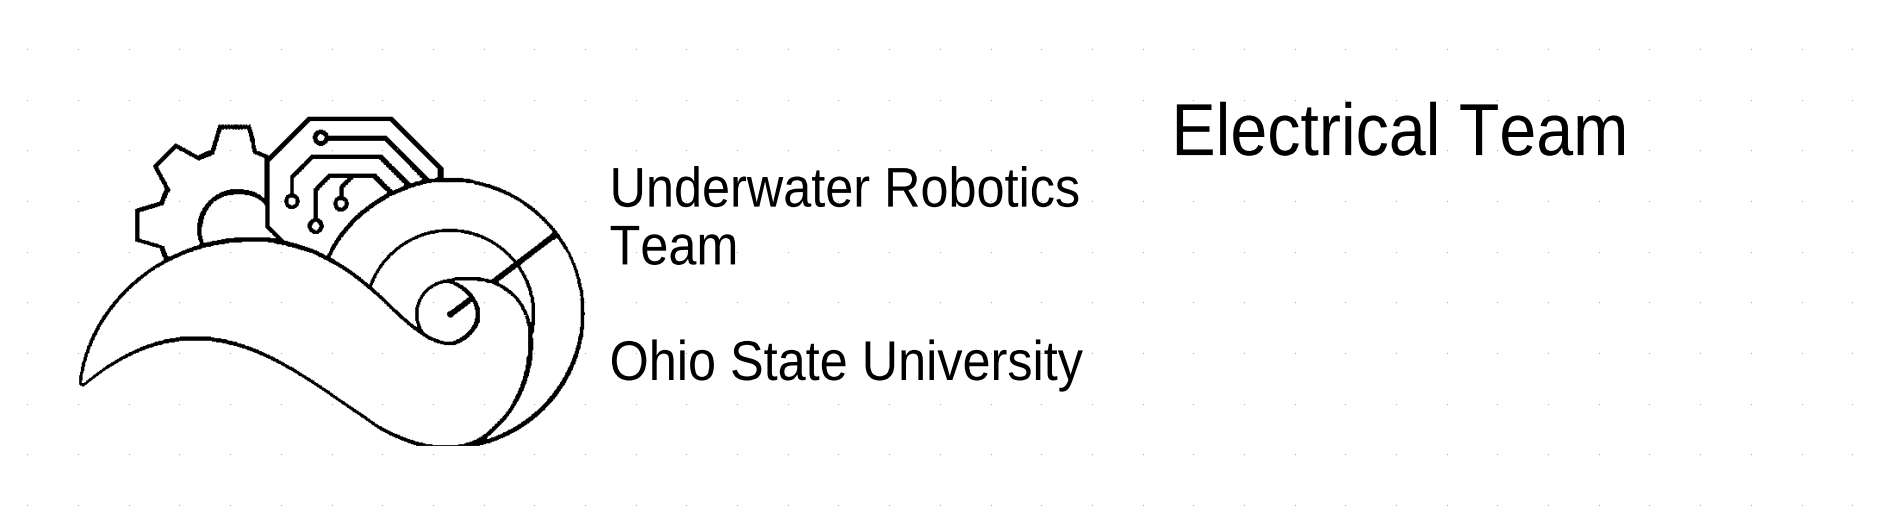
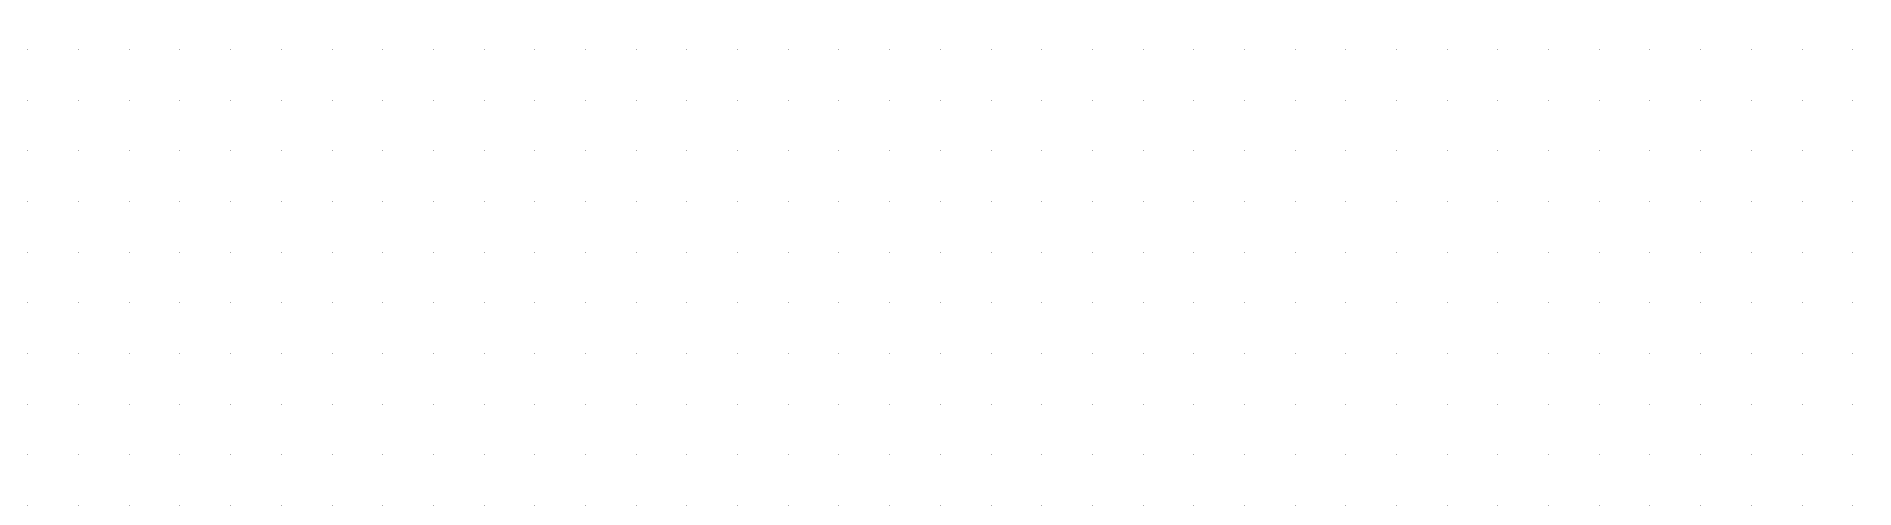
drawing: [79, 116, 586, 446] -> none
text: Electrical Team (1400, 128) -> none
text: Underwater Robotics (845, 186) -> none
text: Team (672, 245) -> none
text: Ohio State University (847, 365) -> none

